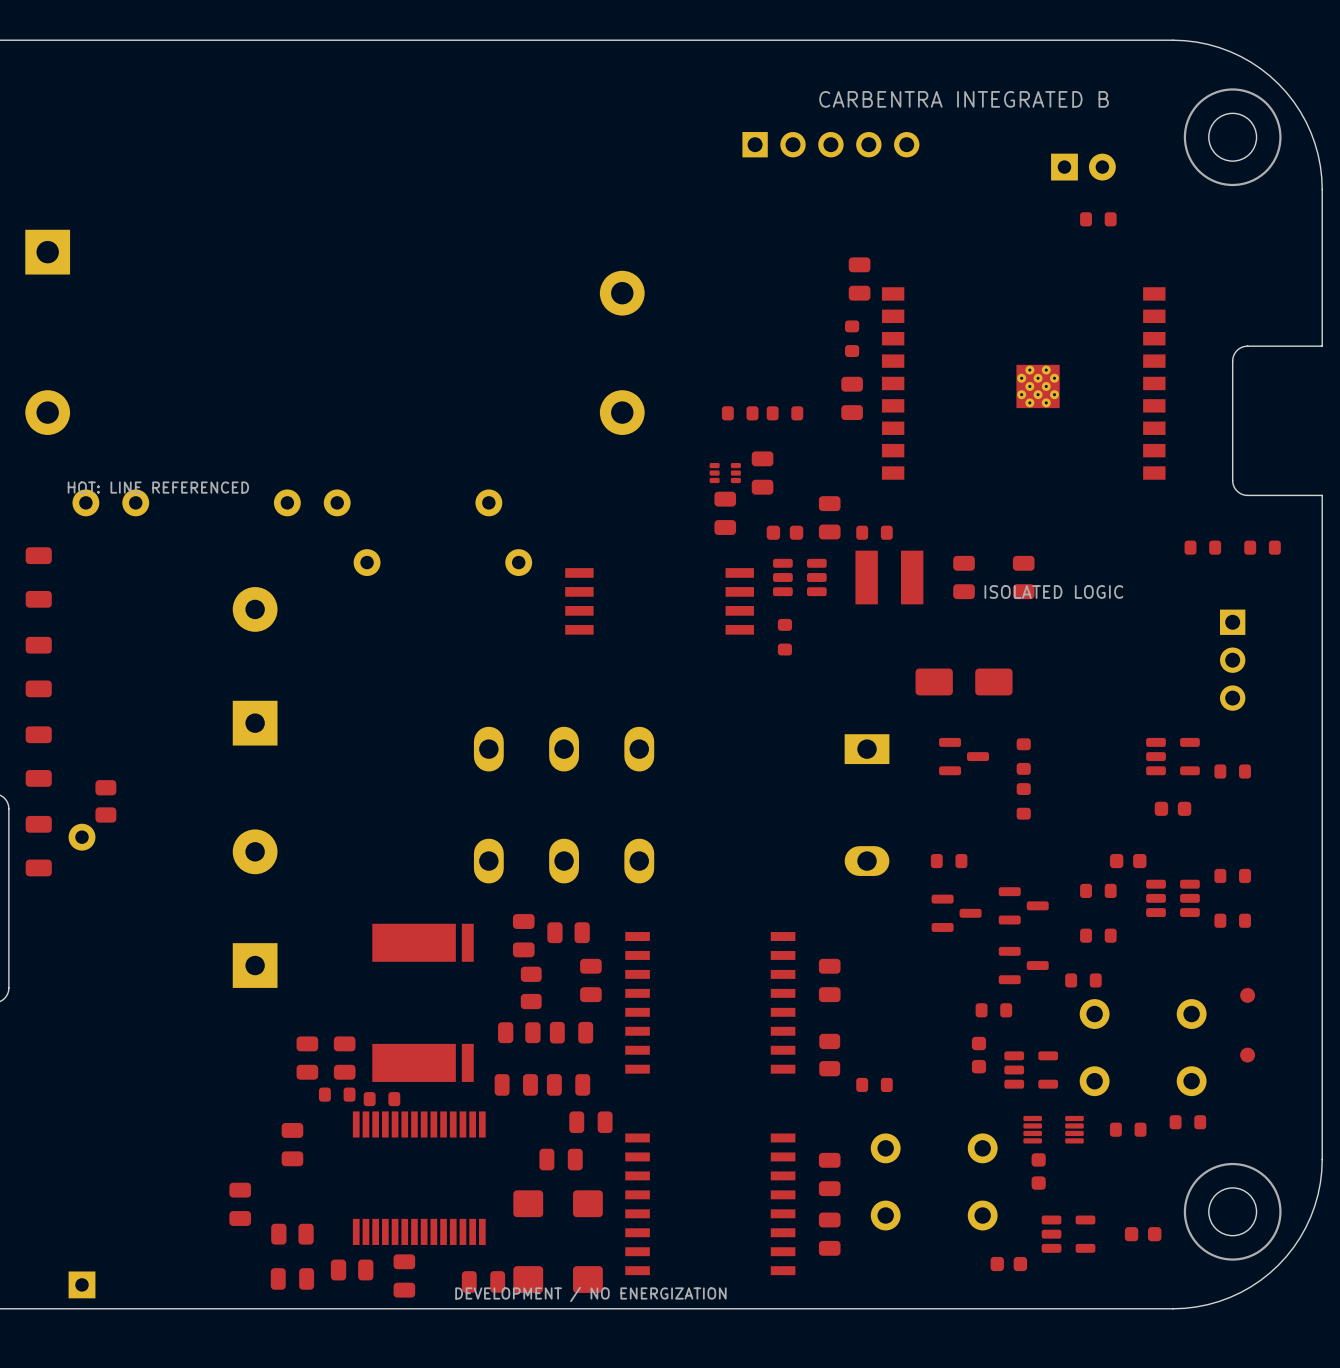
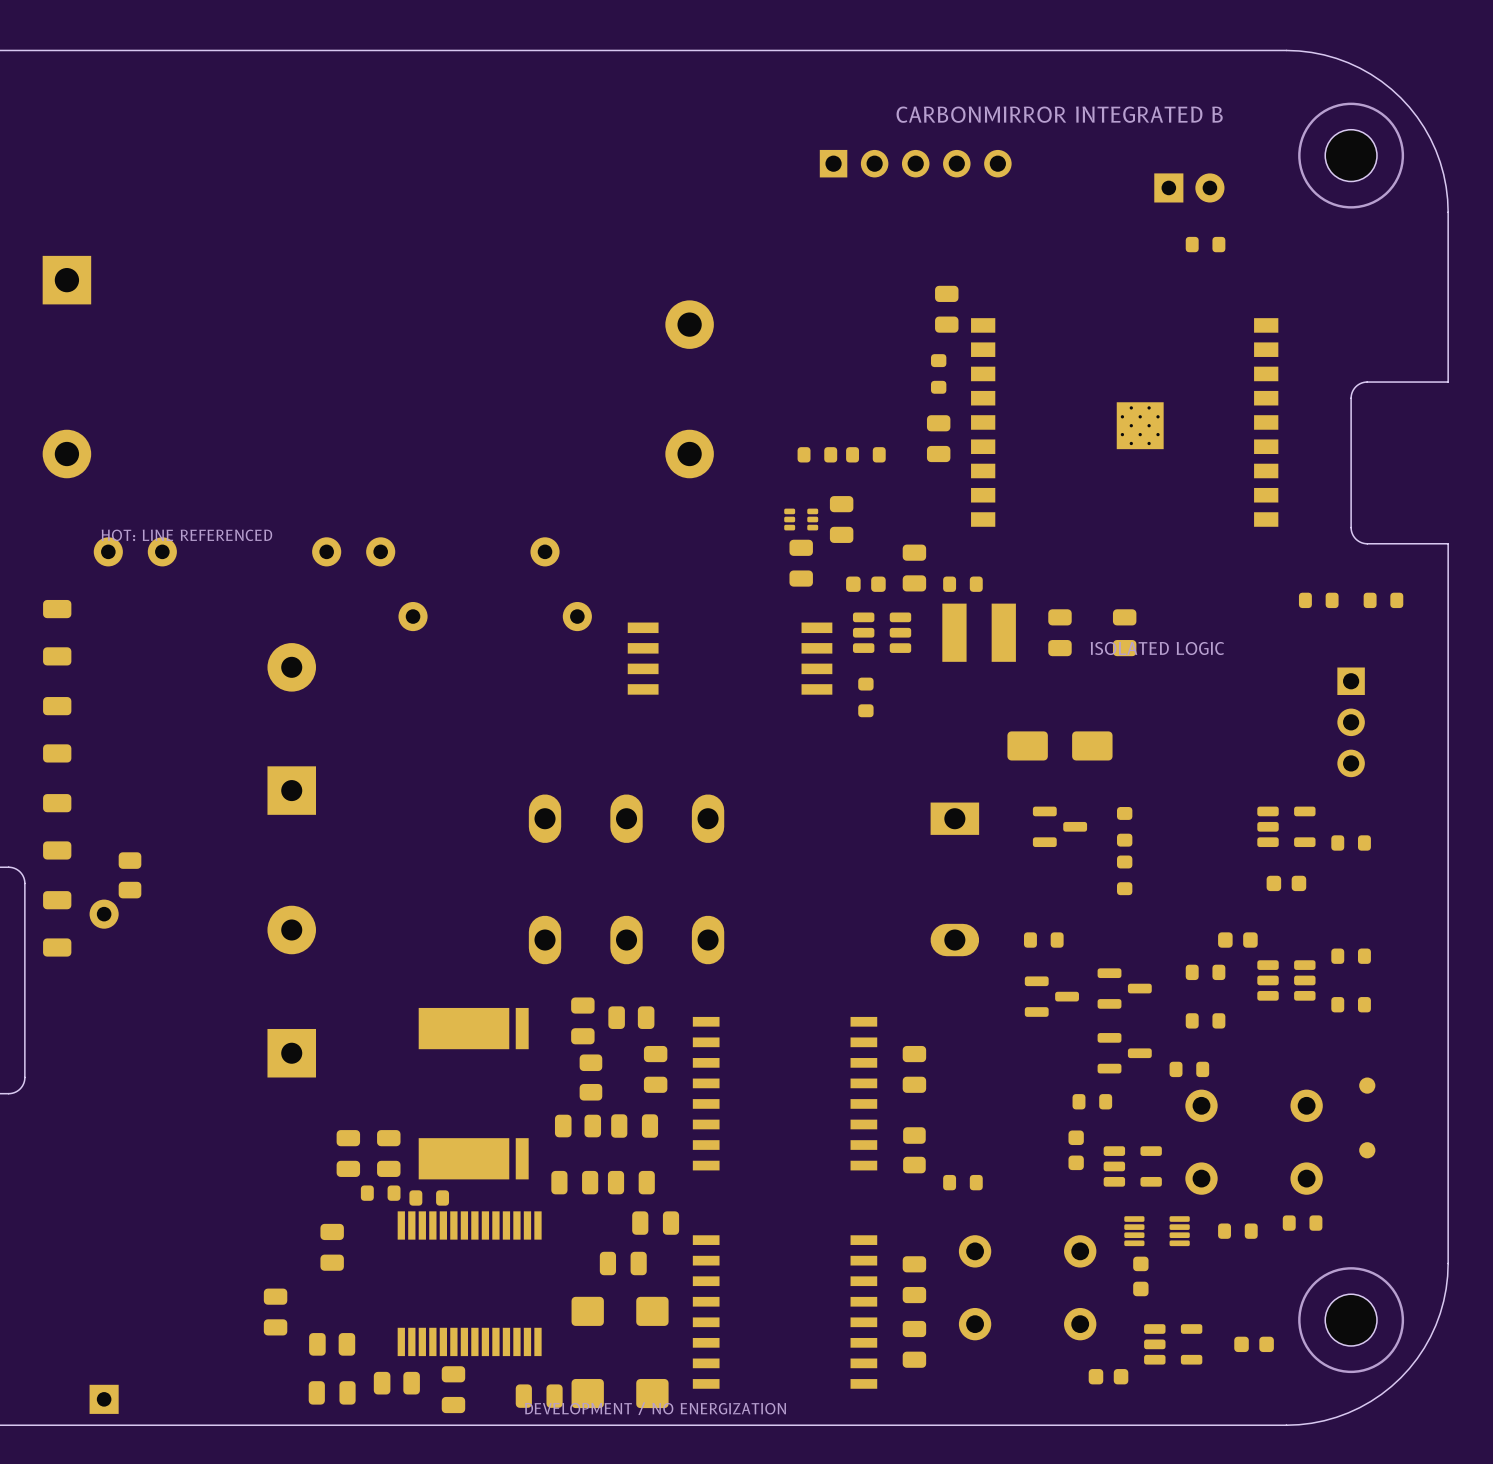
text: CARBENTRA INTEGRATED B (964, 99) -> CARBONMIRROR INTEGRATED B (1059, 114)

